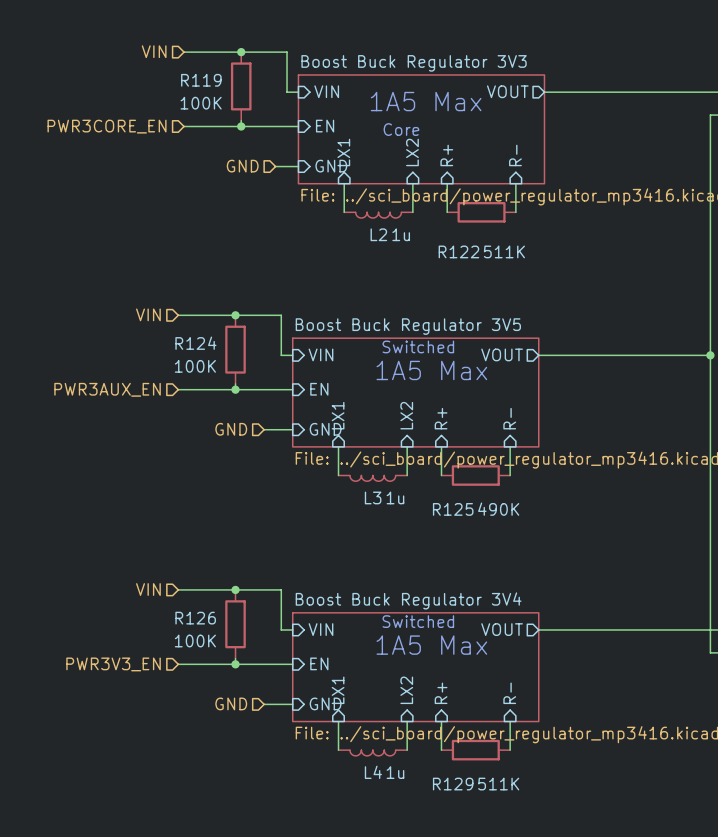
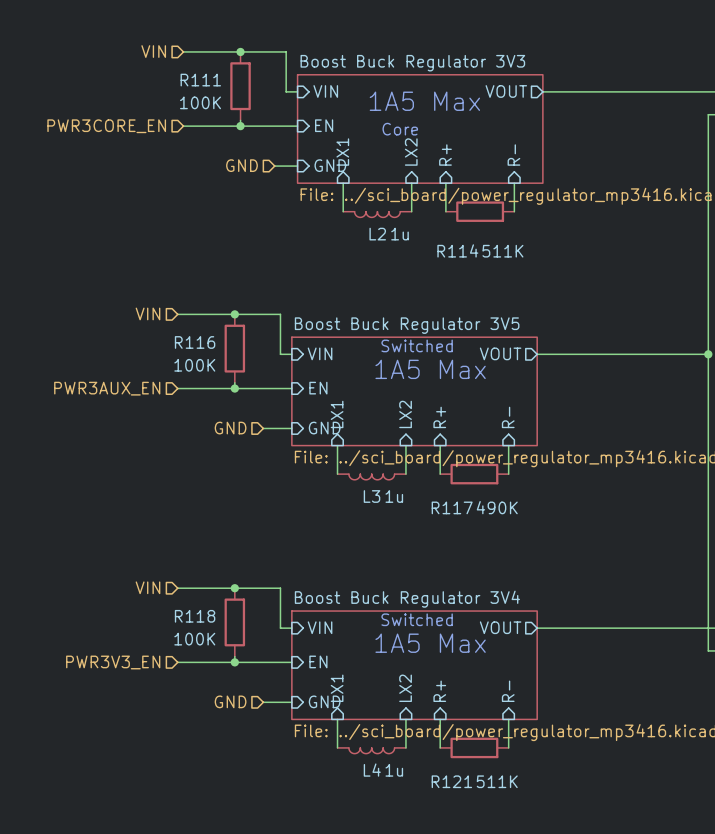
R119 name: R119 (201, 80) -> R111 (200, 80)
R122 name: R122 (458, 251) -> R114 (457, 250)
R124 name: R124 (195, 343) -> R116 (195, 342)
R125 name: R125 (453, 509) -> R117 (452, 507)
R126 name: R126 (195, 618) -> R118 (195, 616)
R129 name: R129 (453, 784) -> R121 (451, 781)

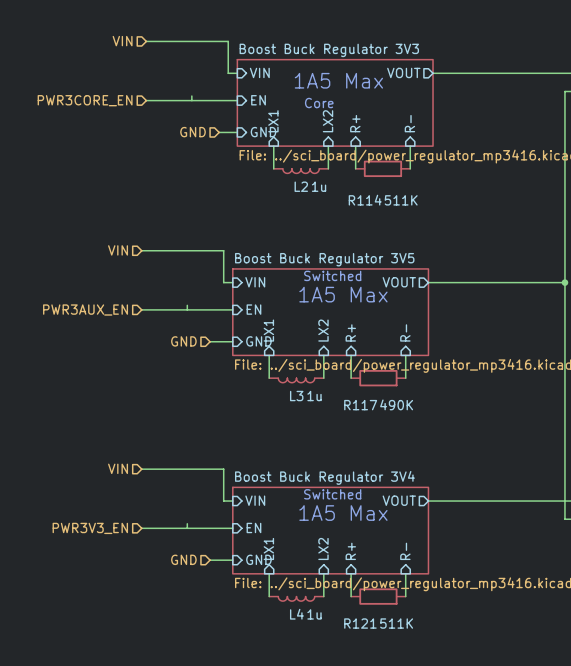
junction: (240, 51) -> none
R111: 100K (240, 86) -> none
junction: (240, 126) -> none
junction: (234, 314) -> none
R116: 100K (234, 348) -> none
junction: (234, 388) -> none
junction: (234, 588) -> none
R118: 100K (234, 622) -> none
junction: (234, 662) -> none

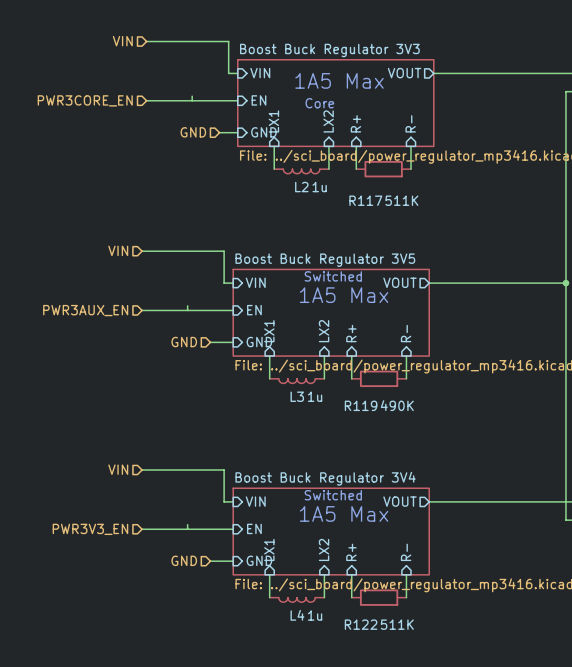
R114 name: R114 (365, 200) -> R117 (365, 200)
R117 name: R117 (360, 405) -> R119 (361, 405)
R121 name: R121 (360, 623) -> R122 (361, 624)

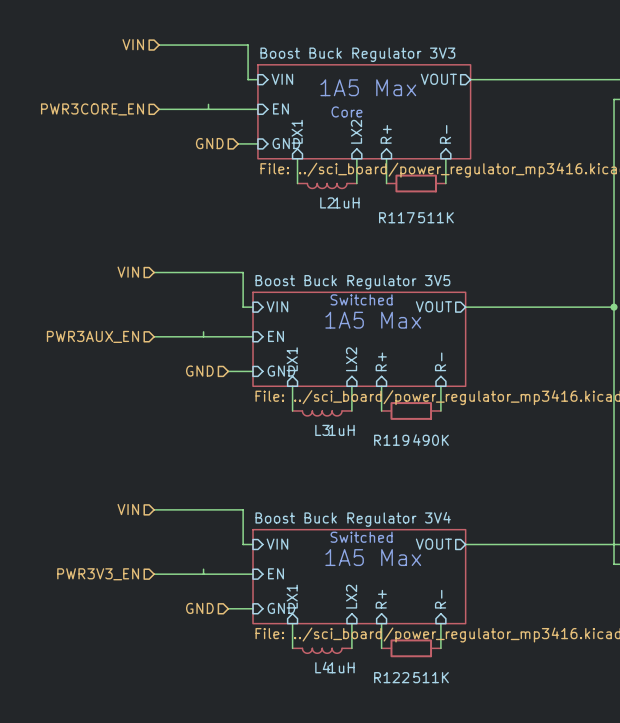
L2 value: 1u (319, 187) -> 1uH (346, 202)
L3 value: 1u (315, 396) -> 1uH (341, 430)
L4 value: 1u (315, 615) -> 1uH (341, 667)

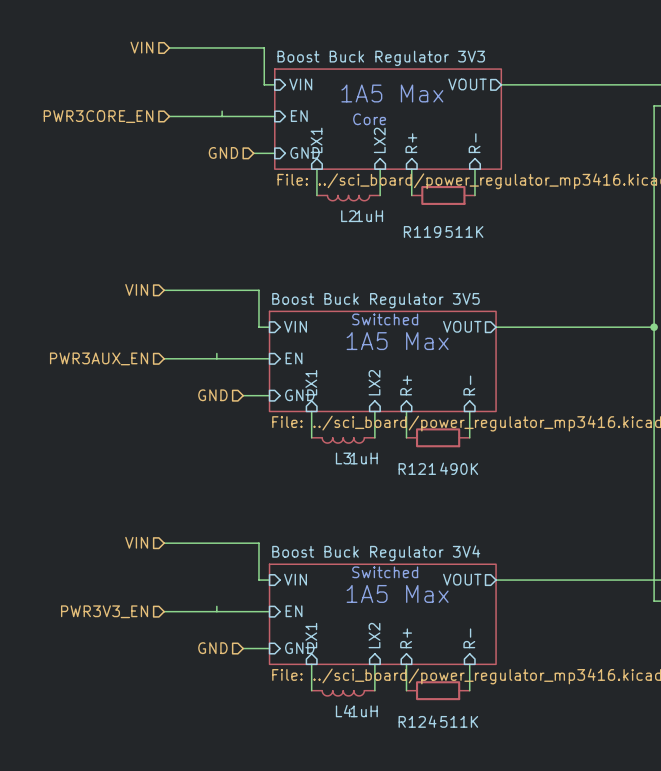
R117 name: R117 (396, 217) -> R119 (422, 231)
R119 name: R119 (391, 440) -> R121 (417, 469)
R122 name: R122 (391, 677) -> R124 (417, 721)

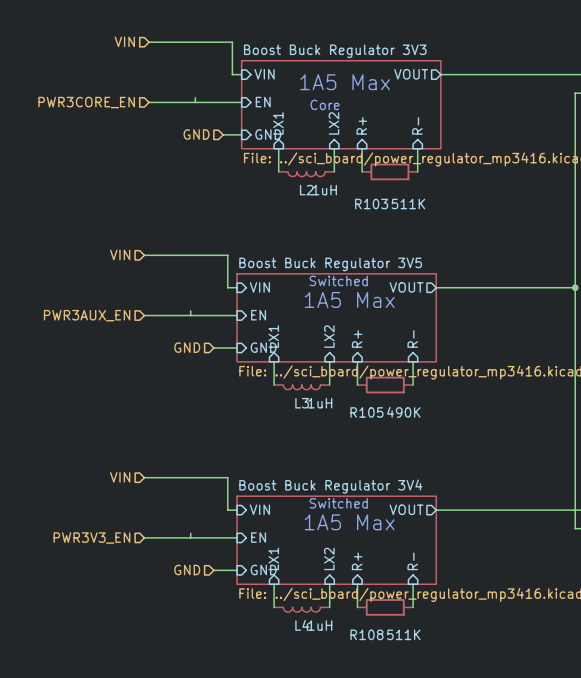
R119 name: R119 (422, 231) -> R103 (371, 204)
R121 name: R121 (417, 469) -> R105 (366, 412)
R124 name: R124 (417, 721) -> R108 (366, 634)

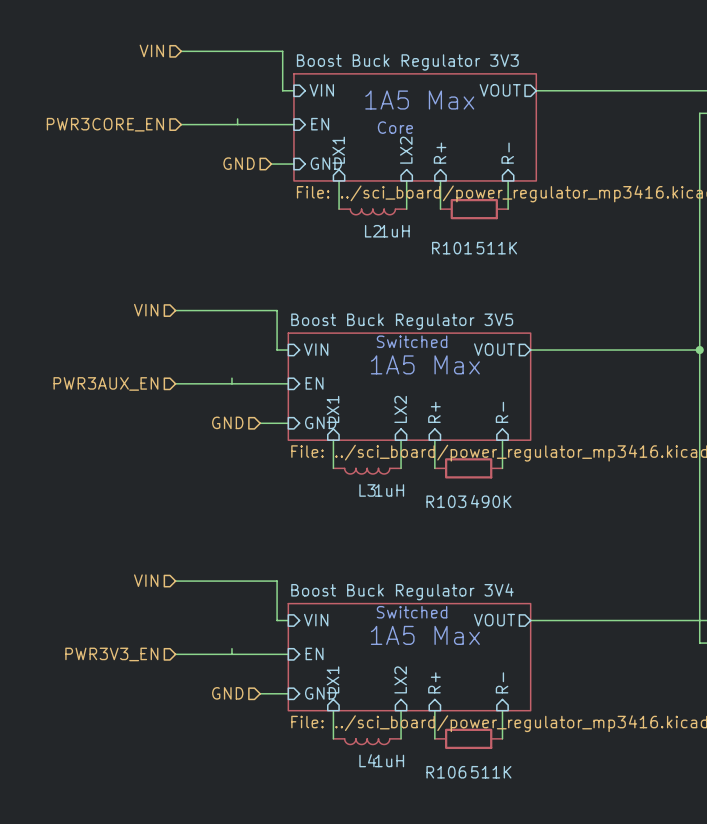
R103 name: R103 (371, 204) -> R101 (452, 248)
R105 name: R105 (366, 412) -> R103 (446, 501)
R108 name: R108 (366, 634) -> R106 (446, 772)

